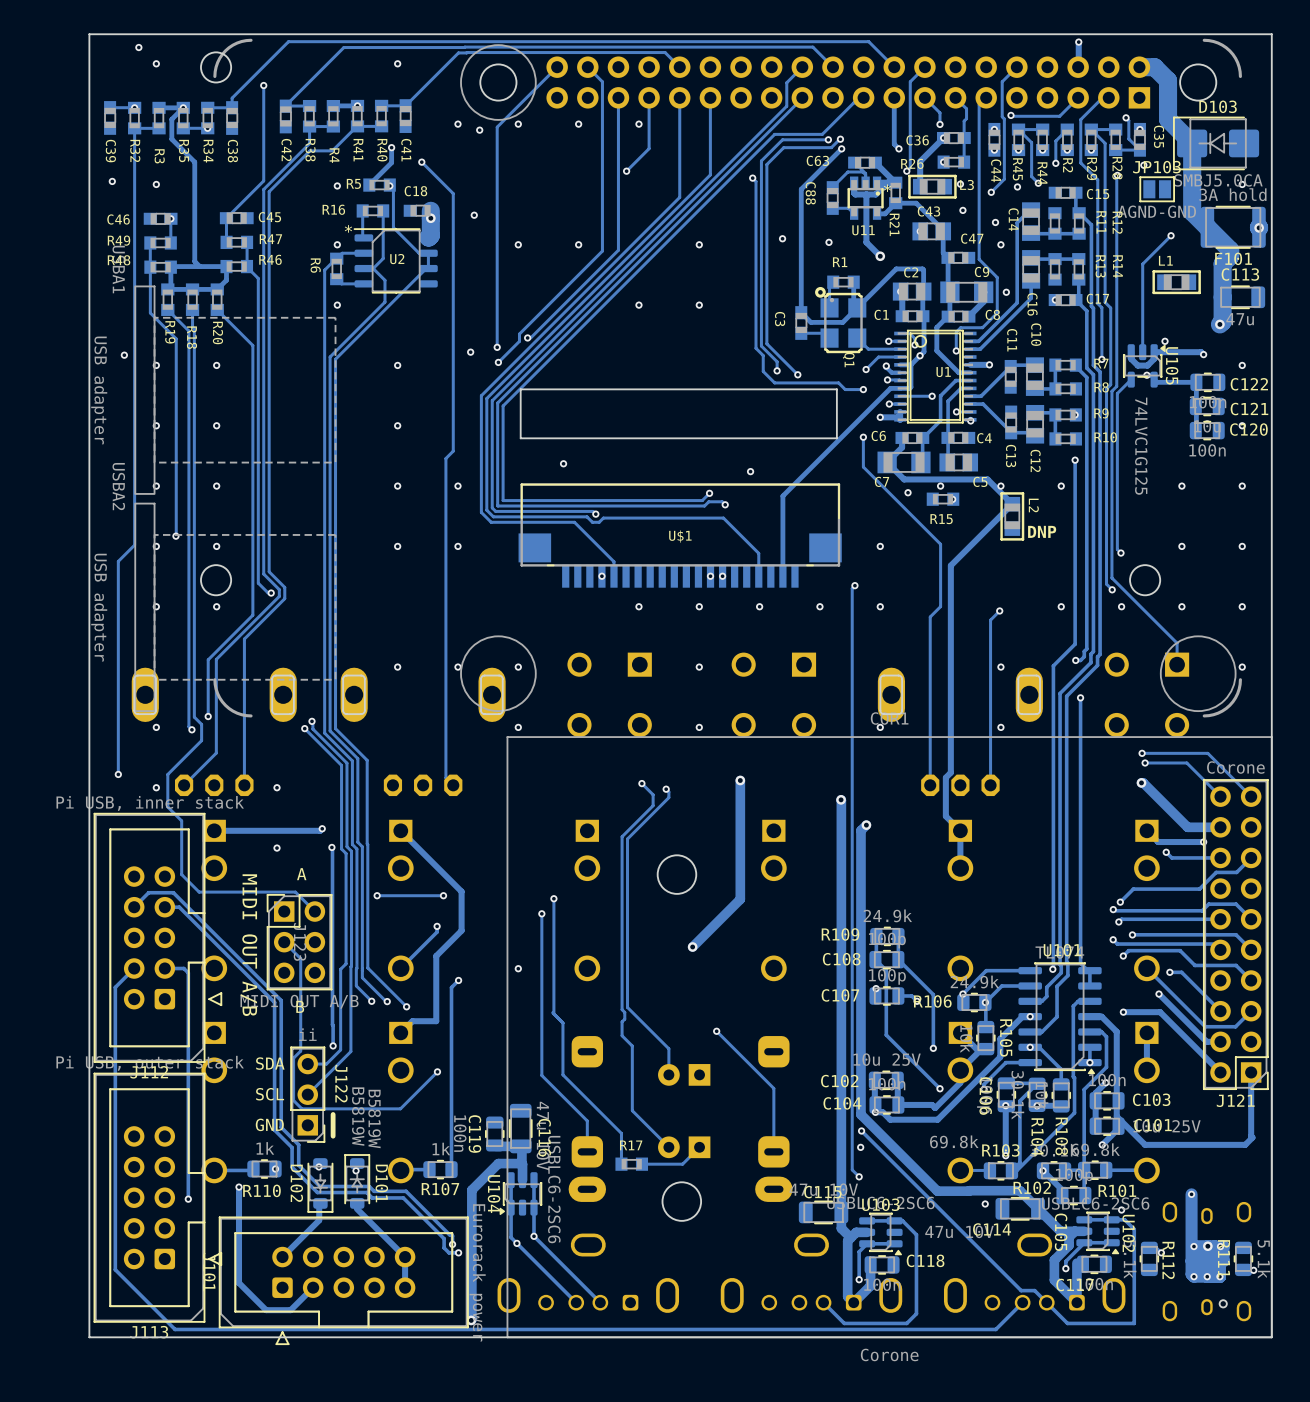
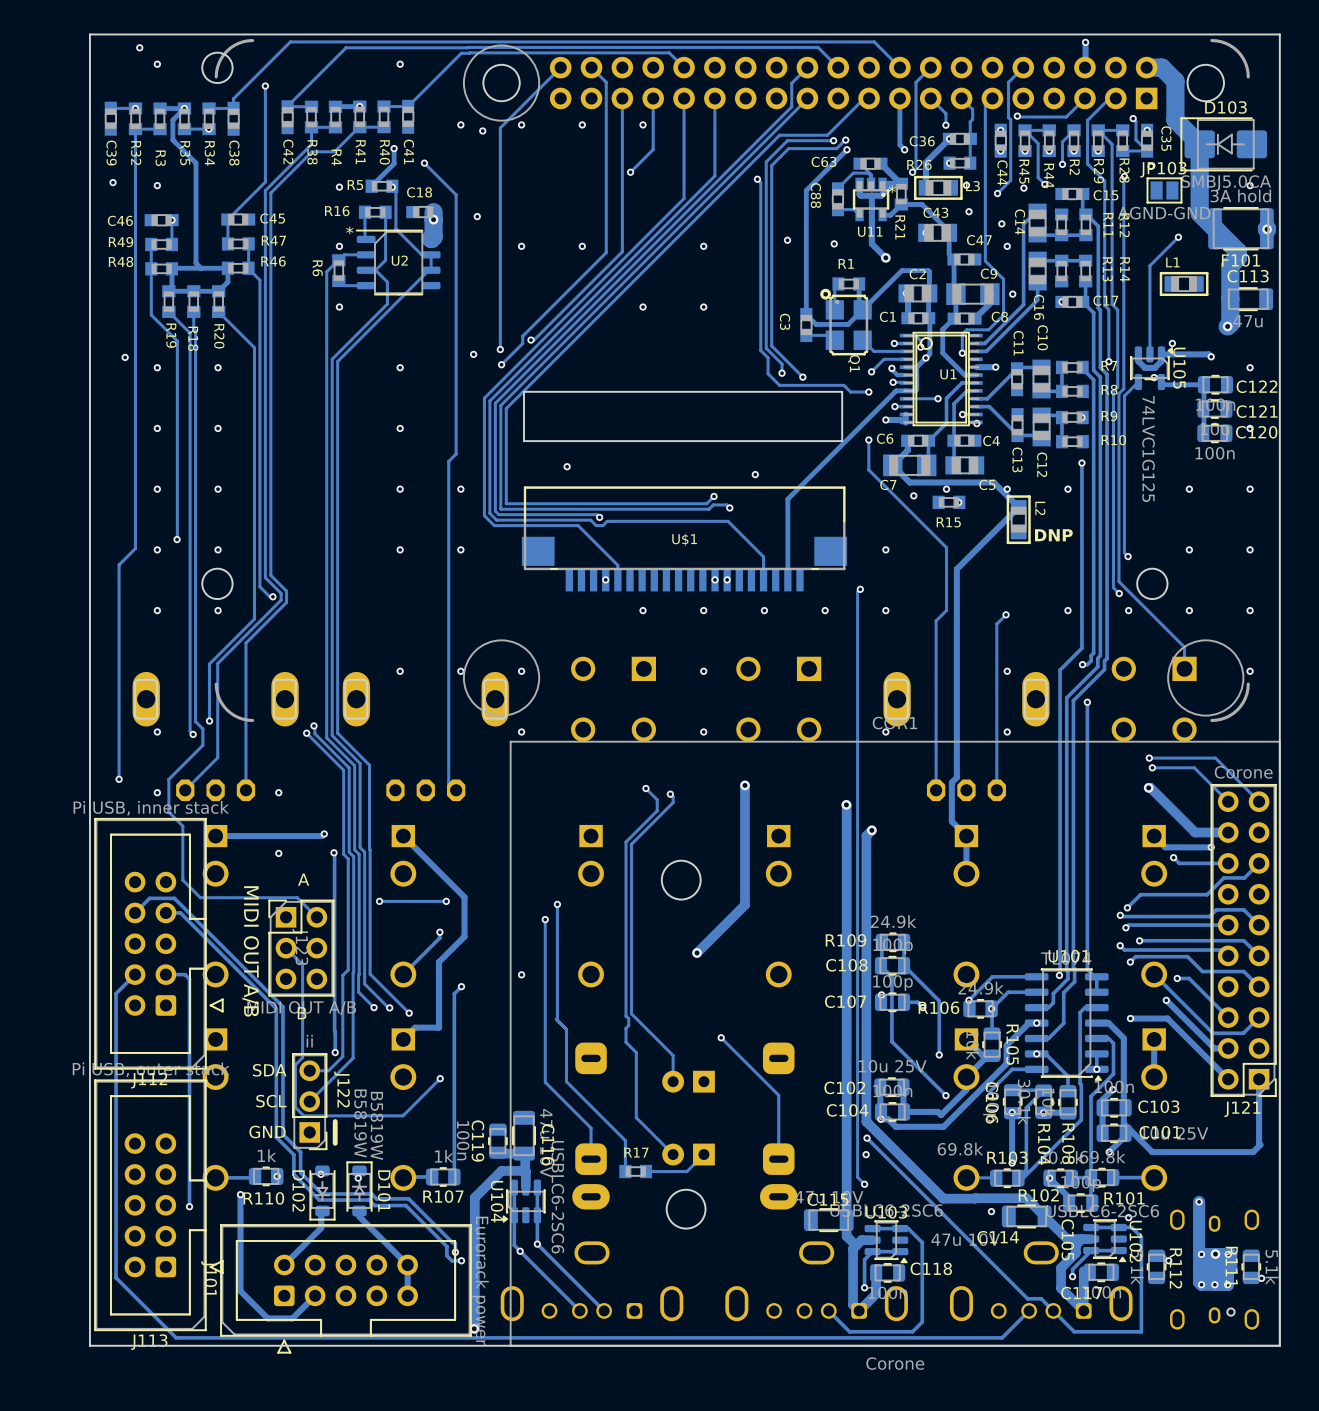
USBA1: USB adapter (235, 390) -> none
USBA2: USB adapter (235, 607) -> none

